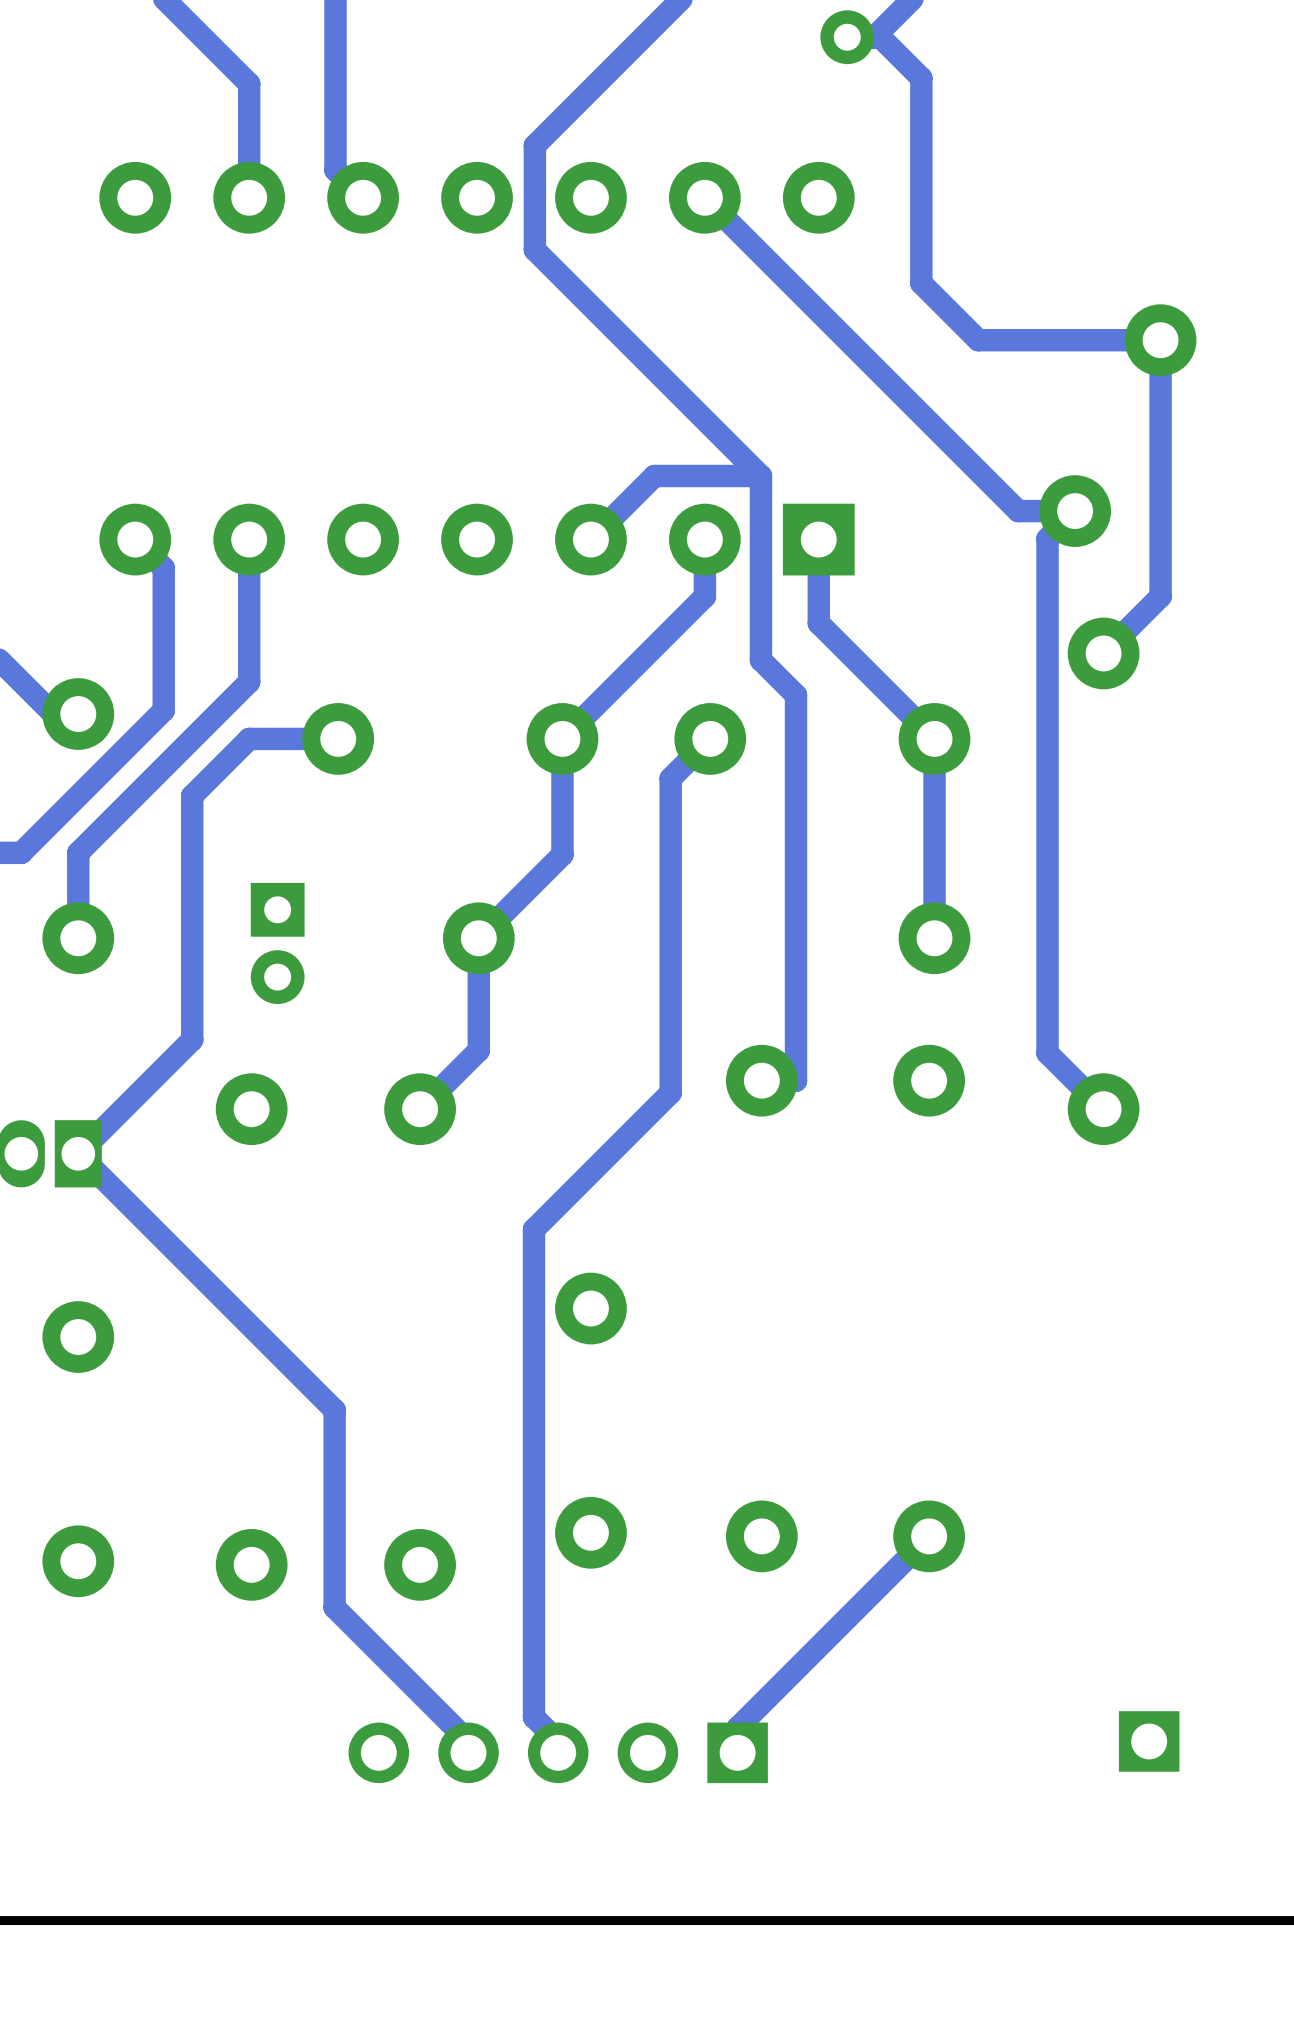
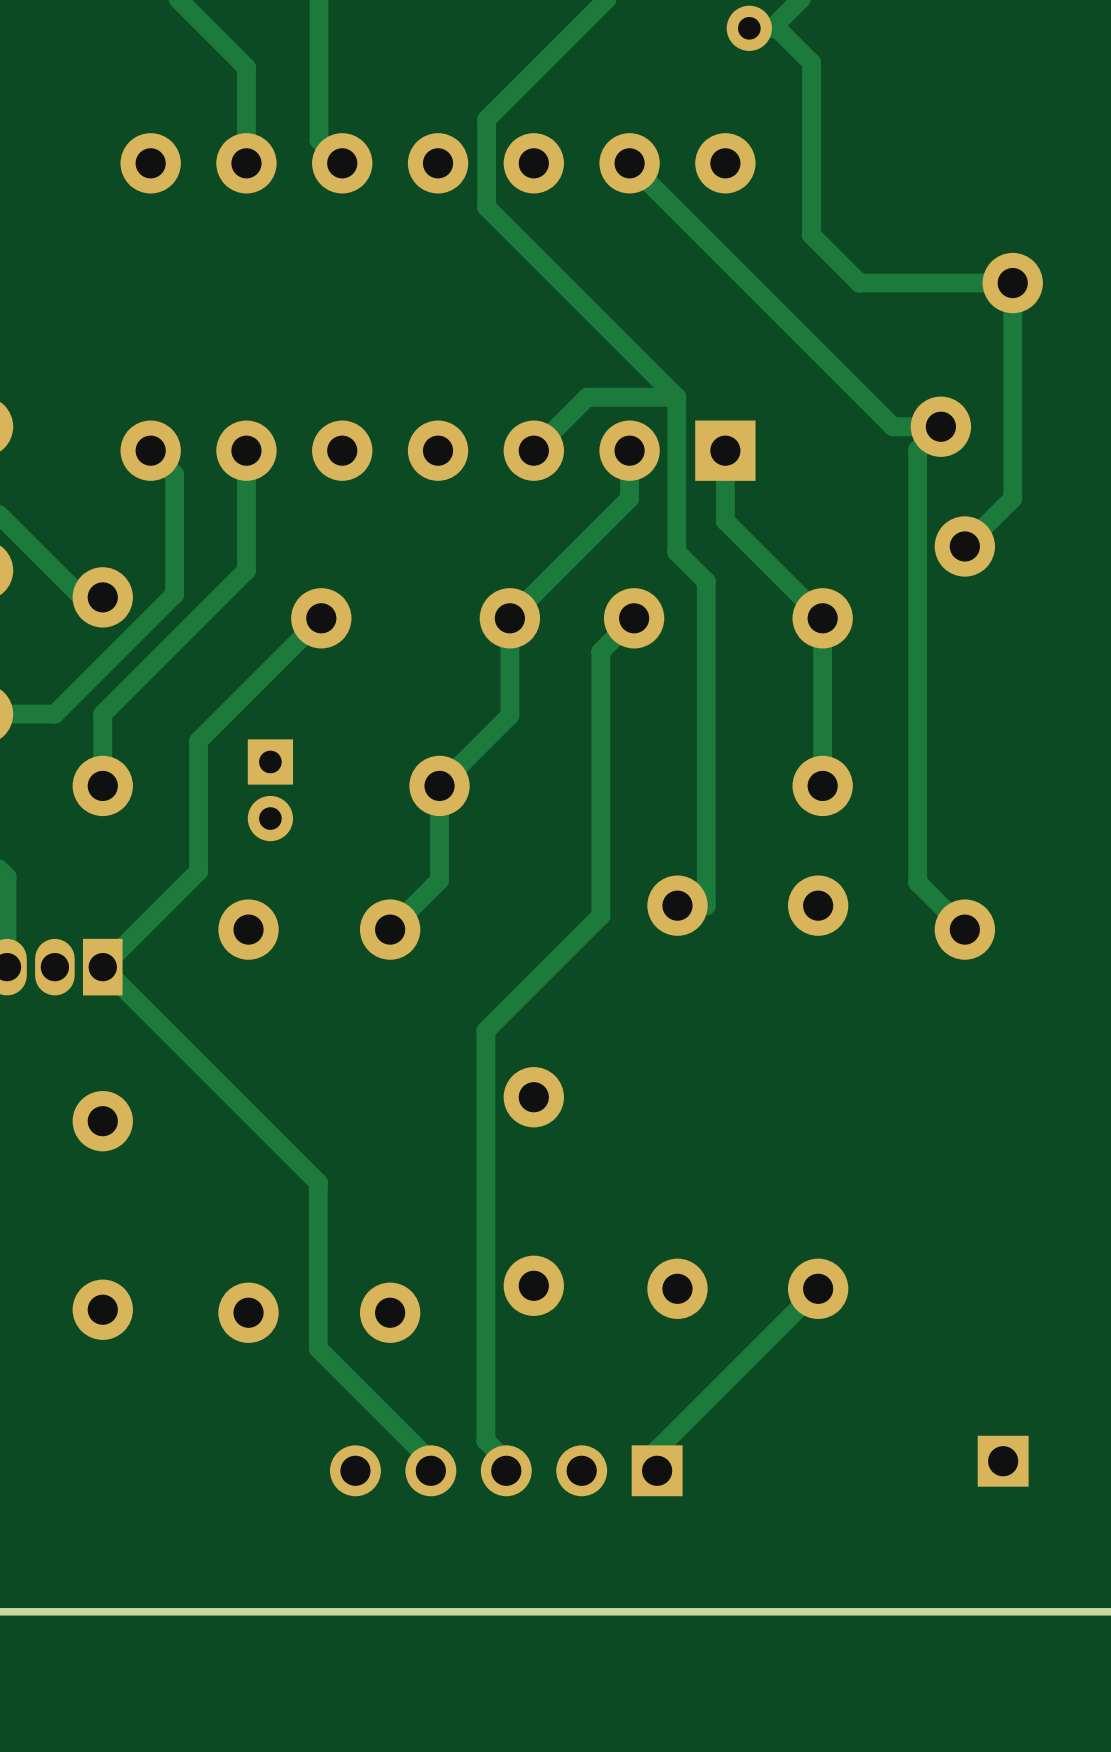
track: (338, 738) (249, 738) (192, 795) (192, 884) -> (321, 618) (198, 741)

